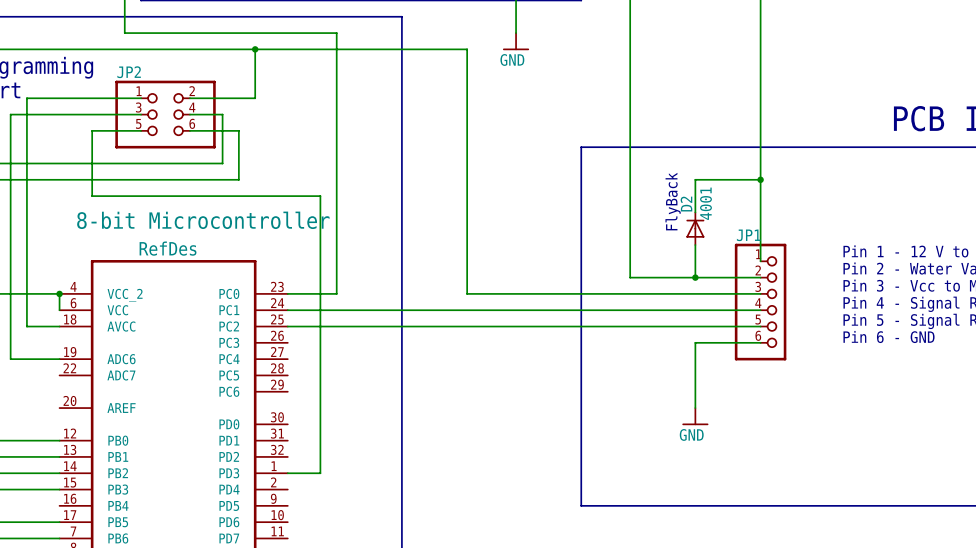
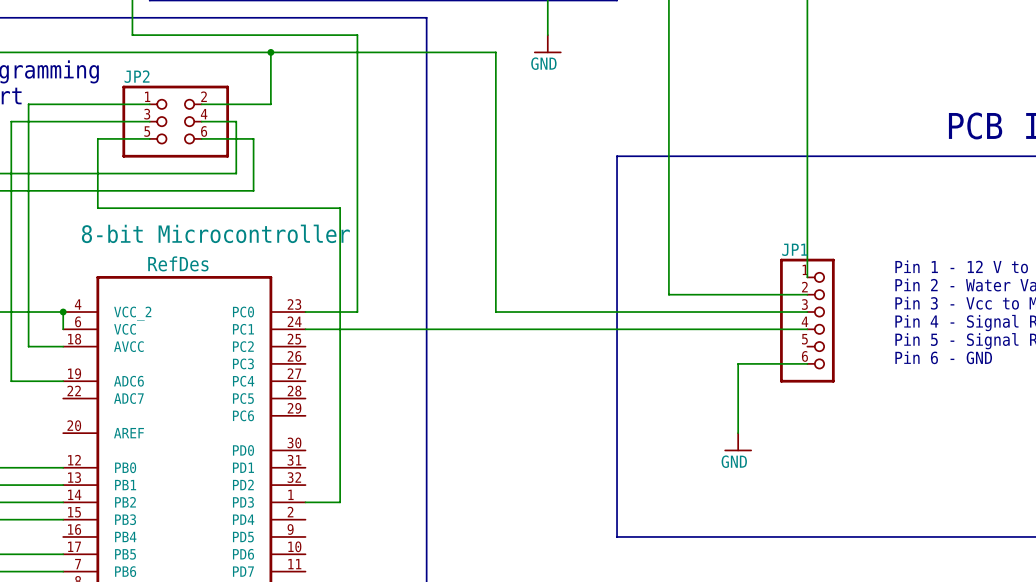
wire: (760, 179) (695, 179) (695, 212) -> none
junction: (760, 179) -> none
text: FlyBack (673, 201) -> none
D2: (695, 228) -> none
wire: (695, 245) (695, 277) -> none
junction: (695, 277) -> none
wire: (287, 326) (760, 326) -> none

